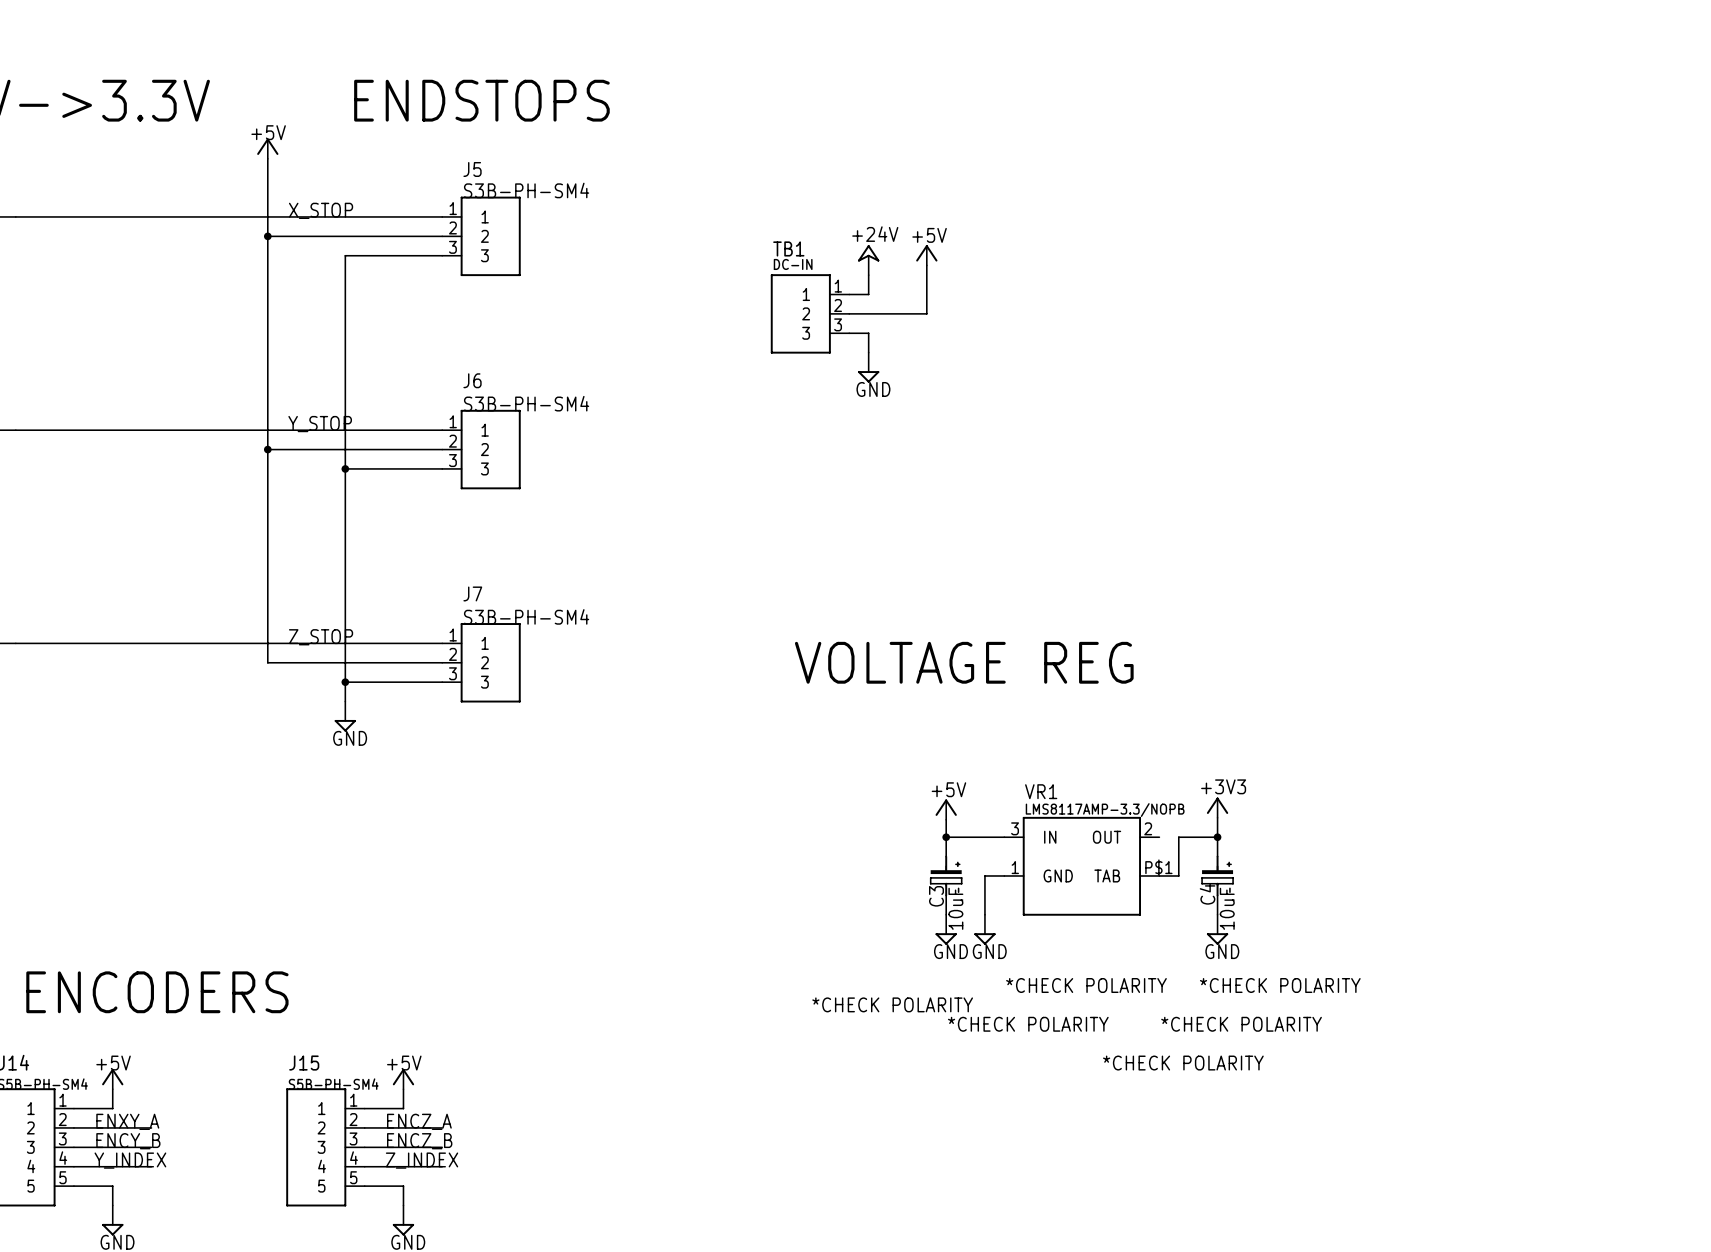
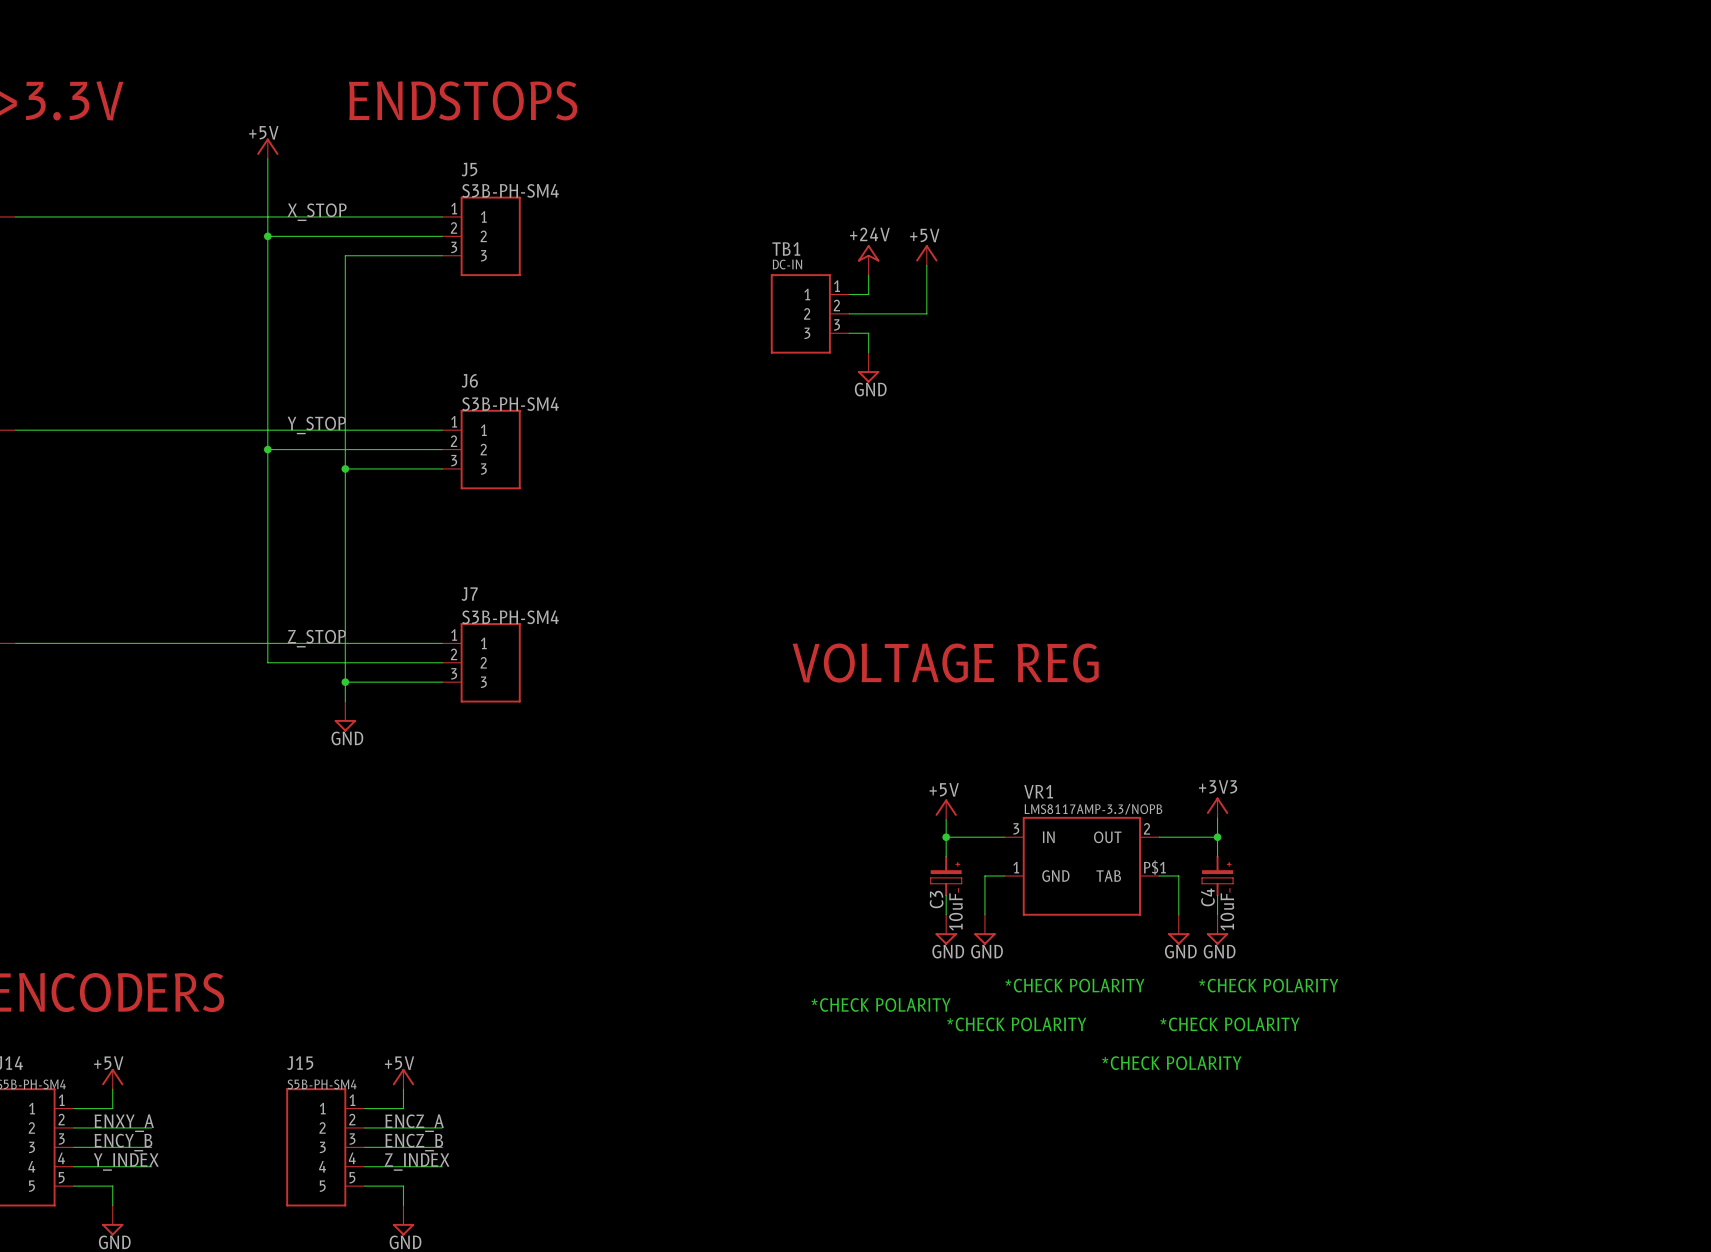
wire: (1178, 837) (1178, 875) -> (1178, 837) (1159, 837)
wire: none -> (1178, 875) (1178, 914)
power symbol: none -> GND (1178, 929)

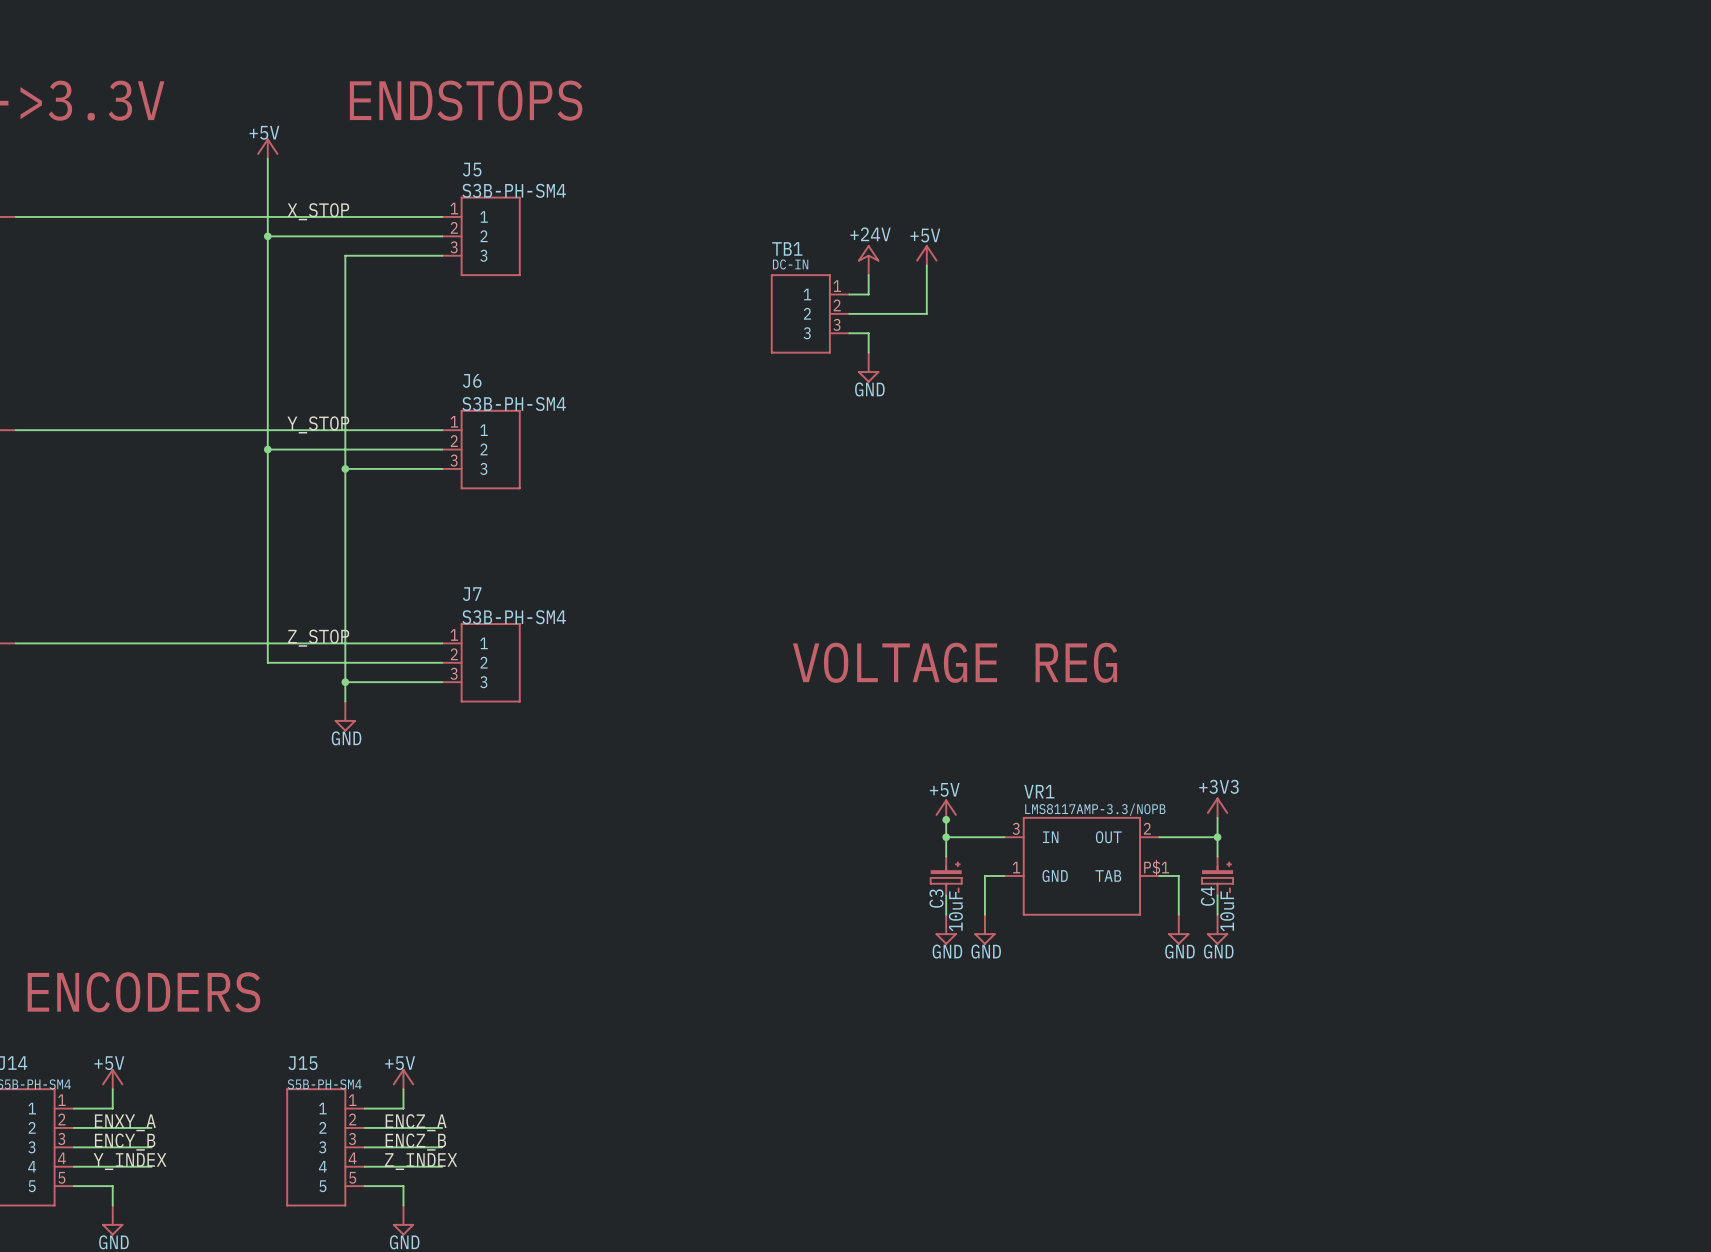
junction: none -> (946, 819)
text: *CHECK POLARITY (1074, 985) -> none
text: *CHECK POLARITY (1268, 985) -> none
text: *CHECK POLARITY (881, 1004) -> none
text: *CHECK POLARITY (1016, 1024) -> none
text: *CHECK POLARITY (1229, 1024) -> none
text: *CHECK POLARITY (1171, 1063) -> none

